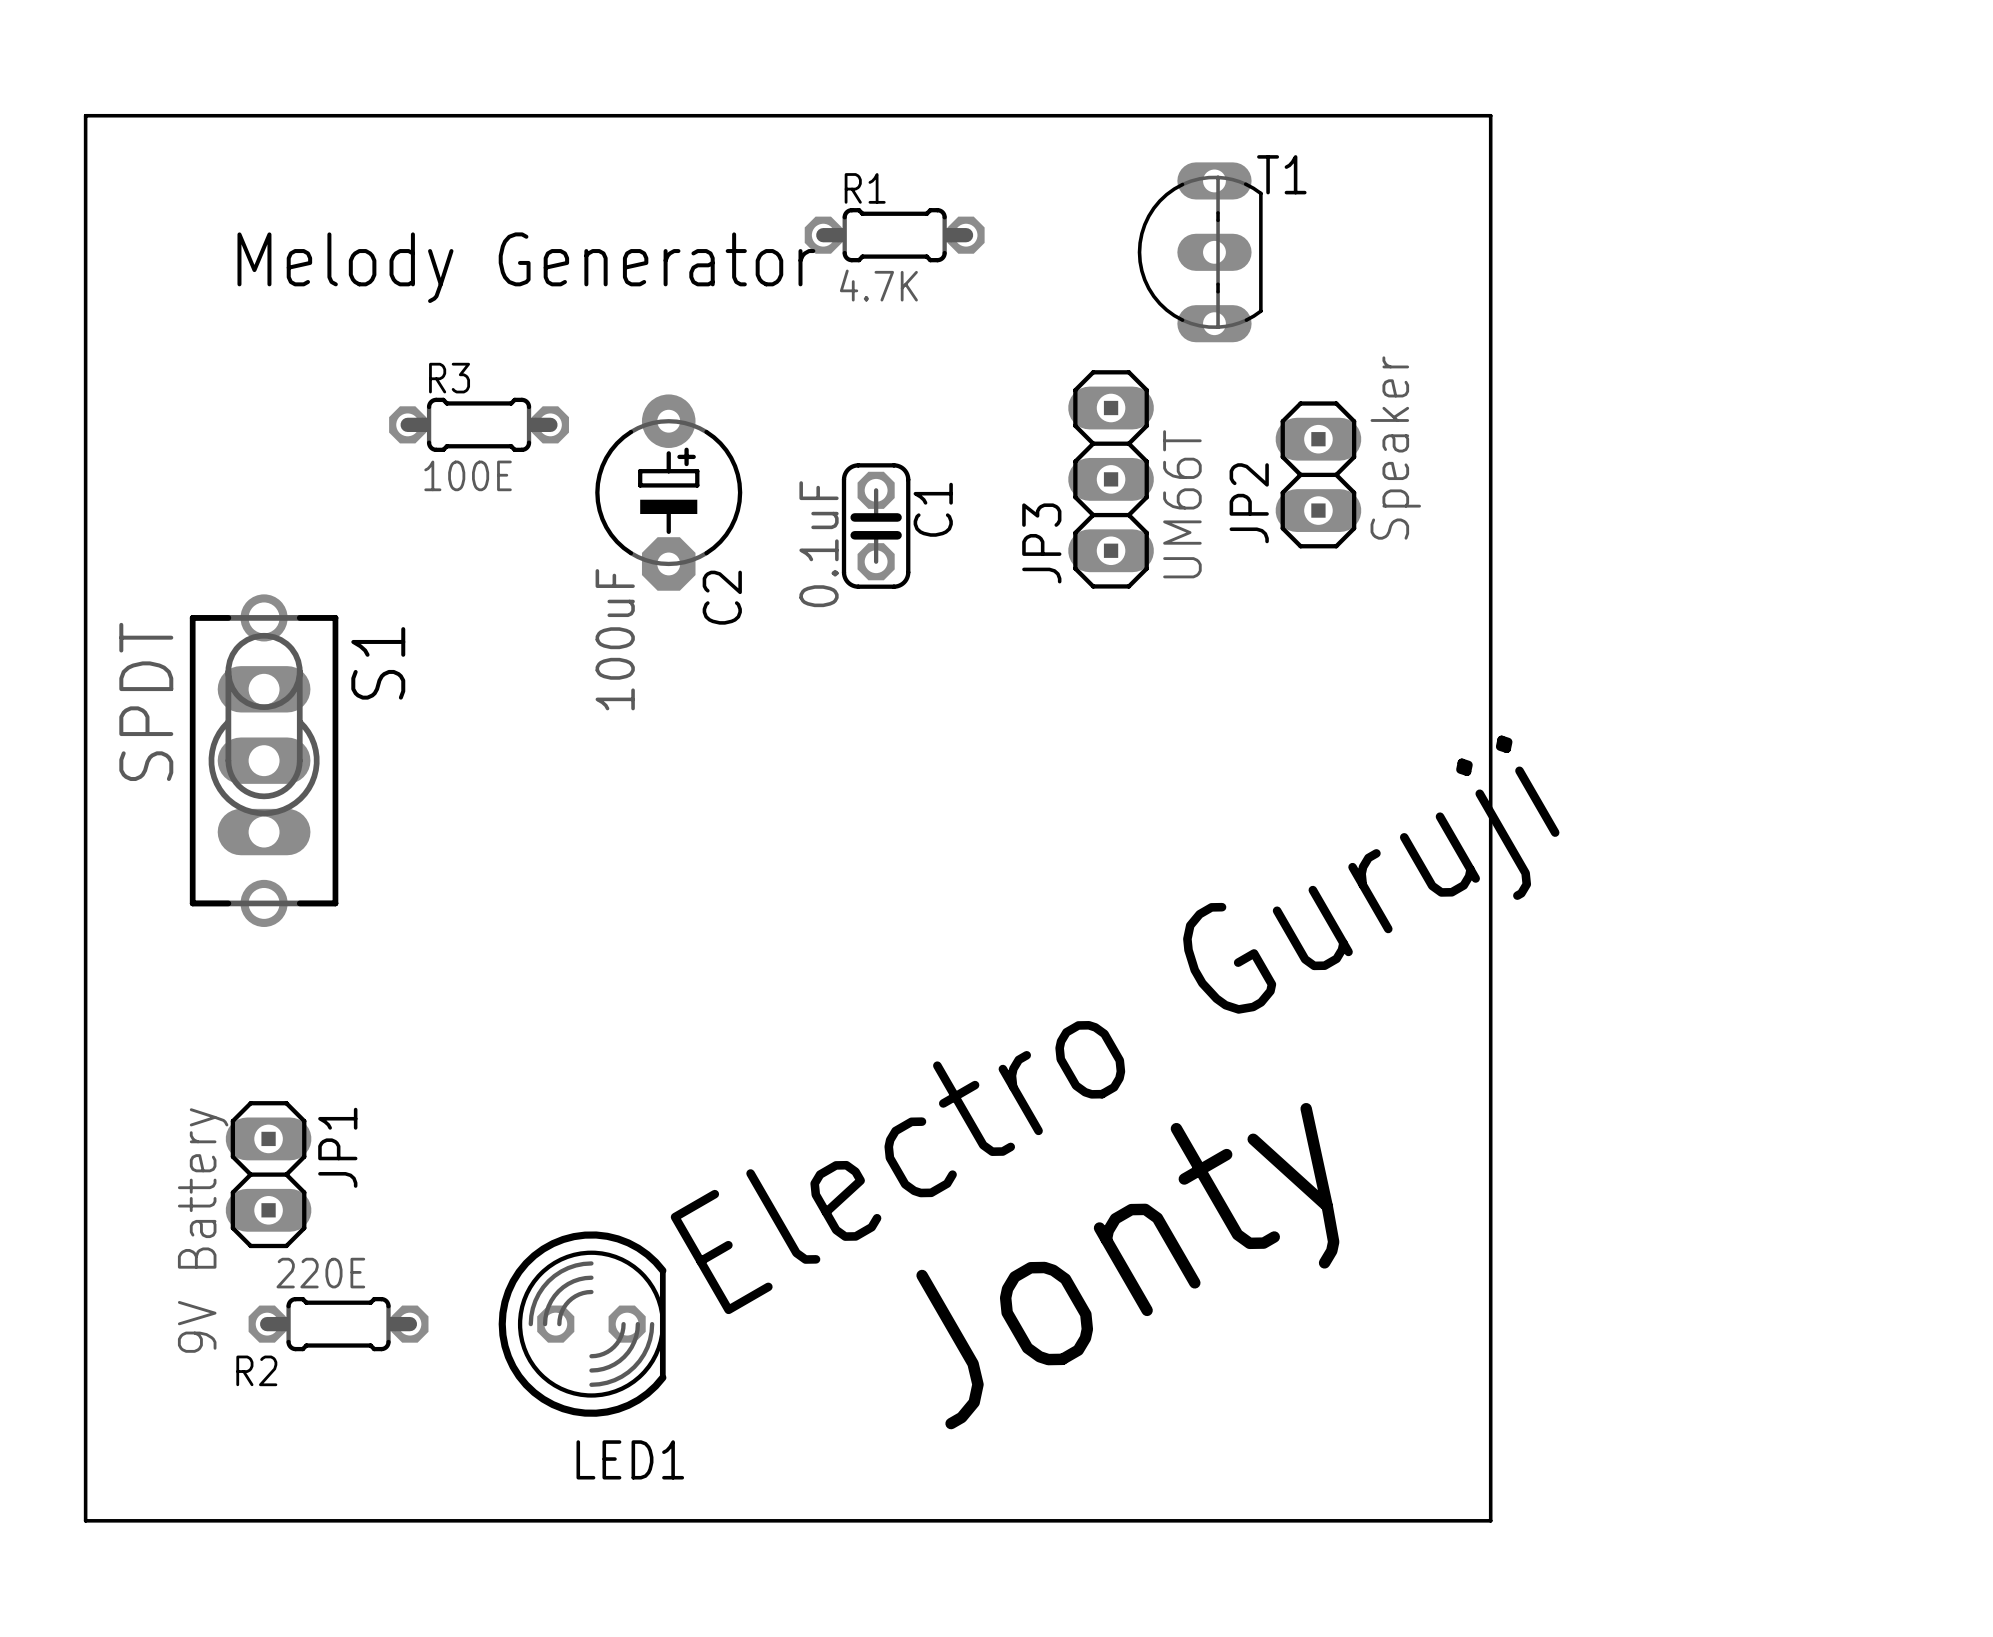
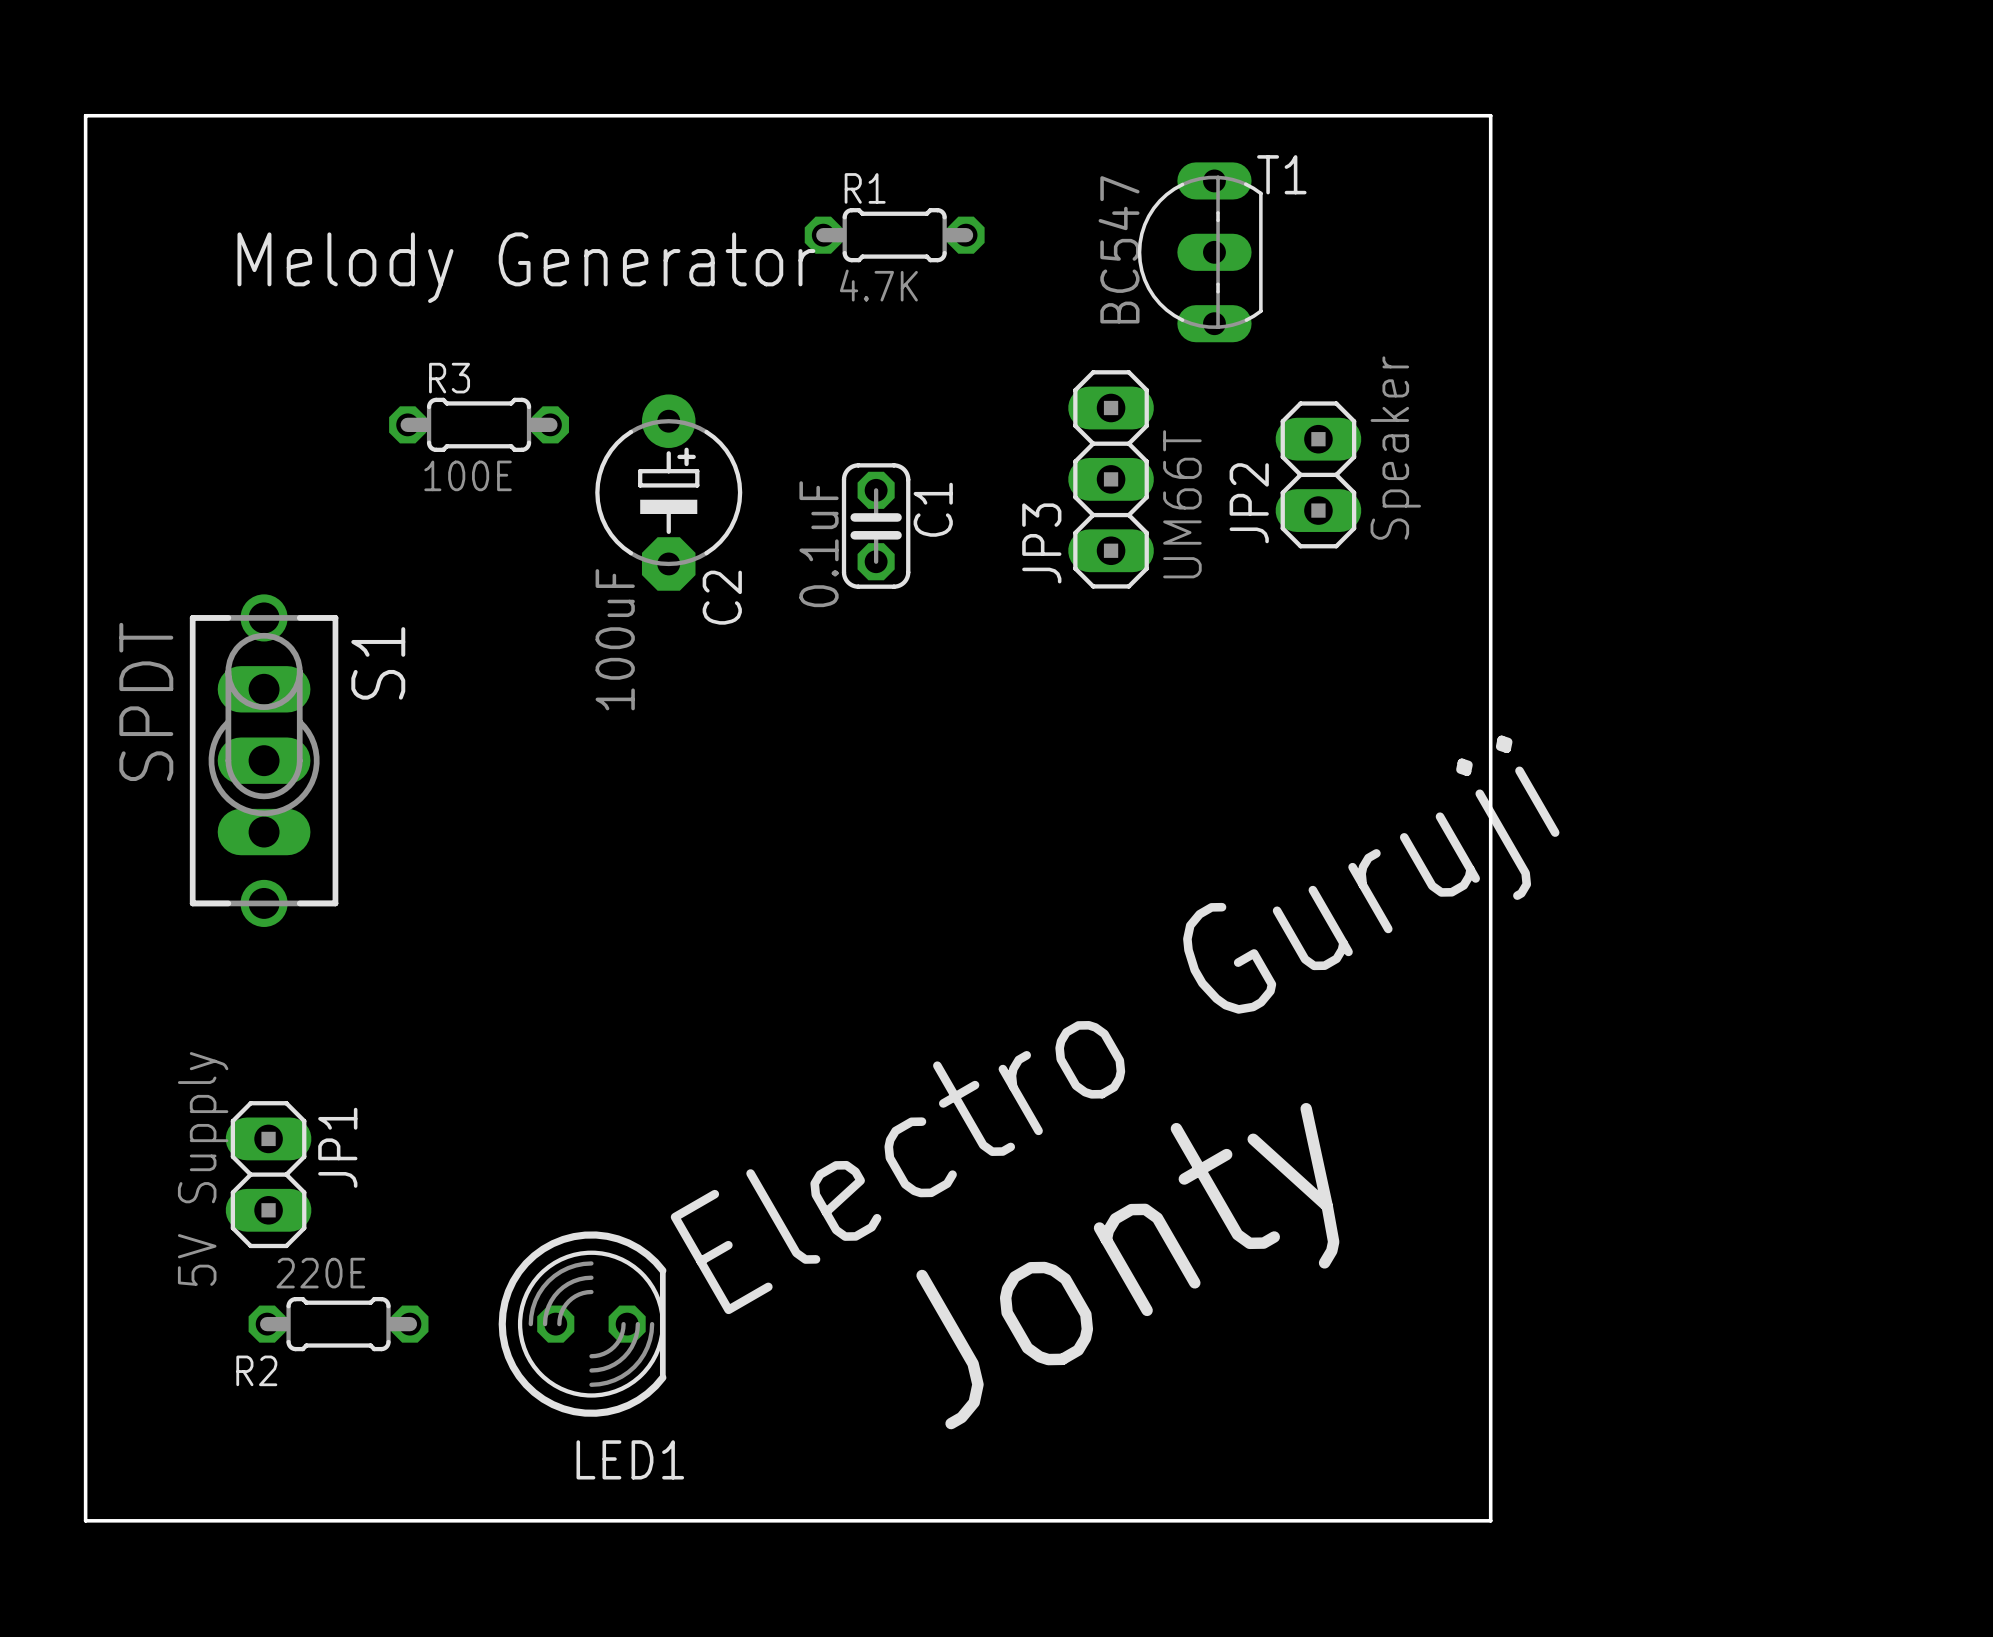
T1 value: none -> BC547 (1119, 249)
JP1 value: 9V Battery (203, 1230) -> 5V Supply (203, 1168)

